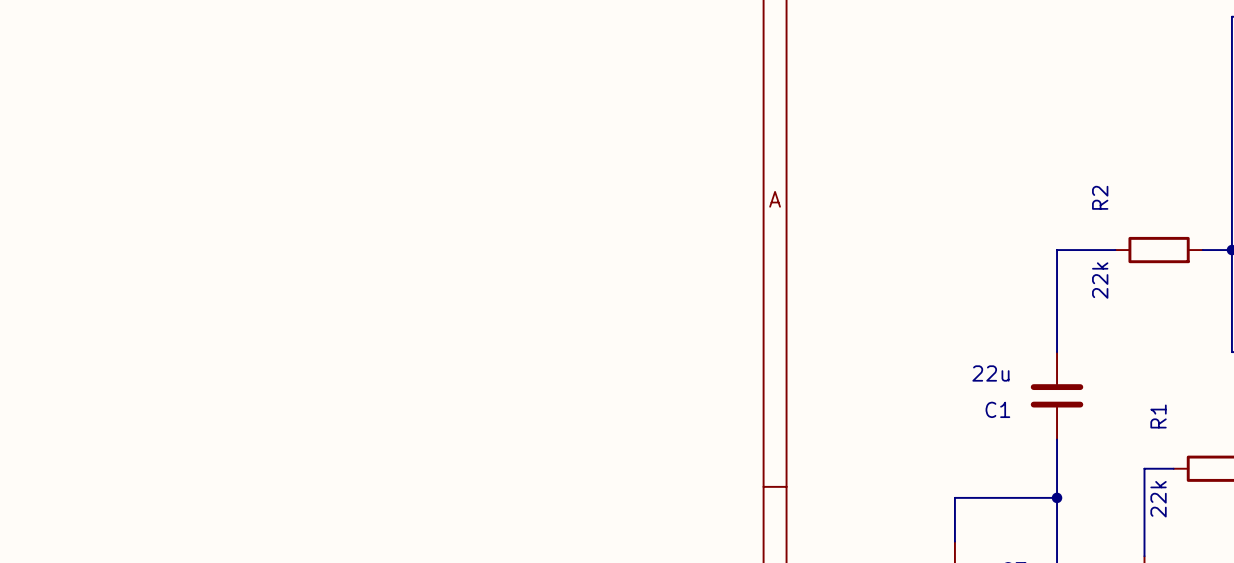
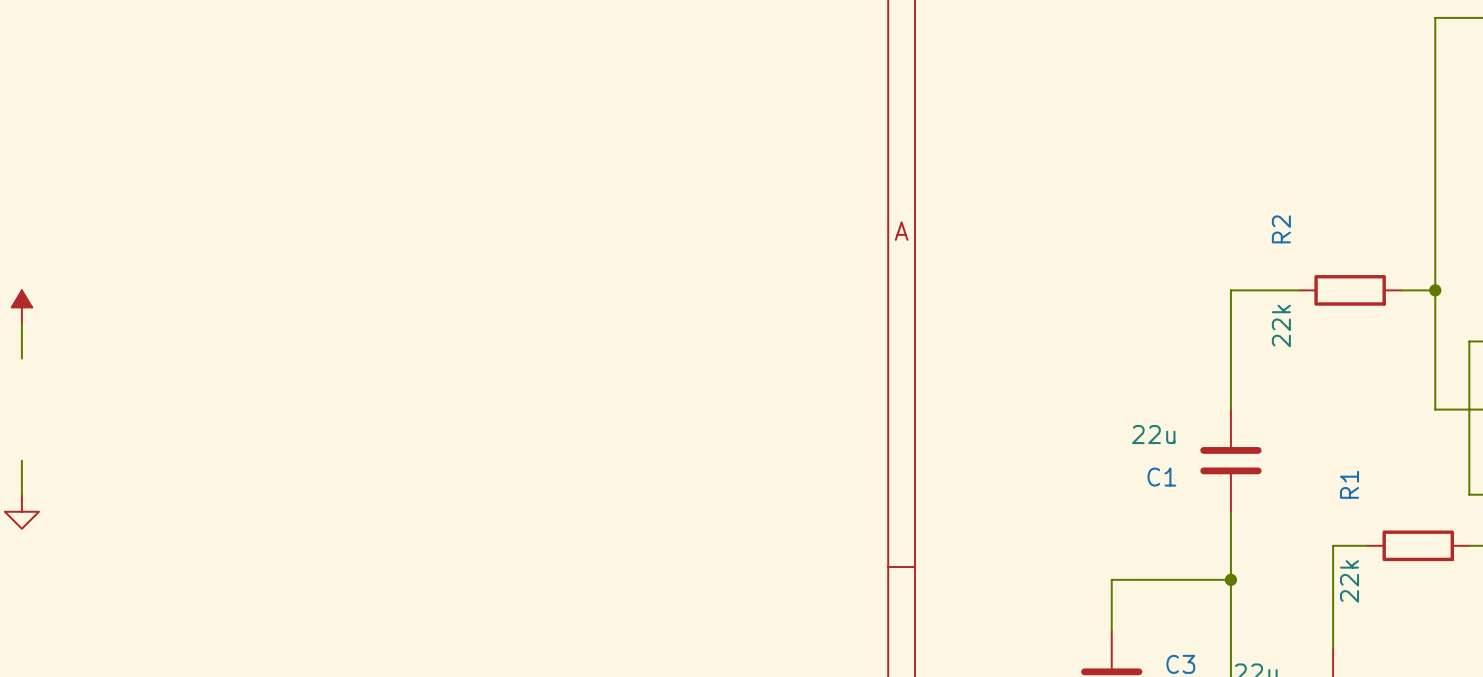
power symbol: none -> (21, 307)
wire: none -> (21, 324) (21, 358)
wire: none -> (21, 460) (21, 494)
power symbol: none -> (21, 511)

